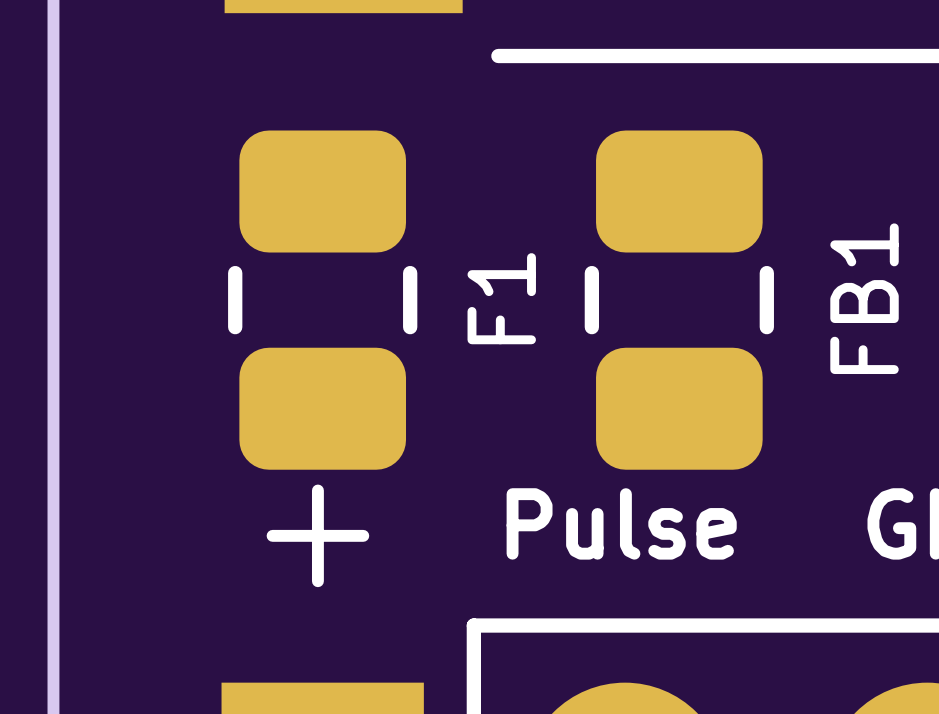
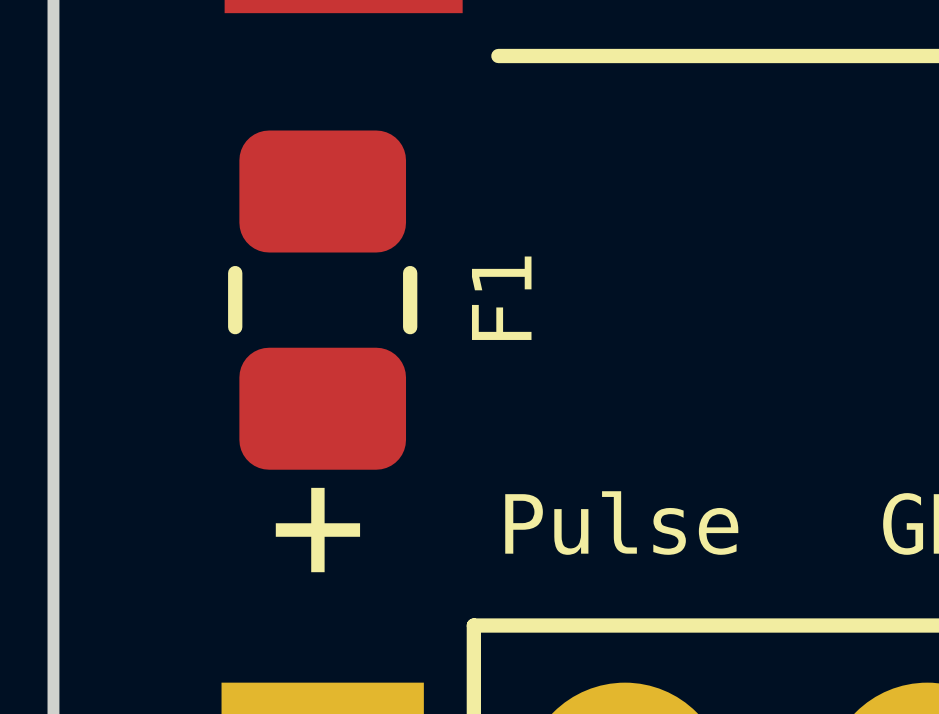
FB1: (679, 300) -> none

